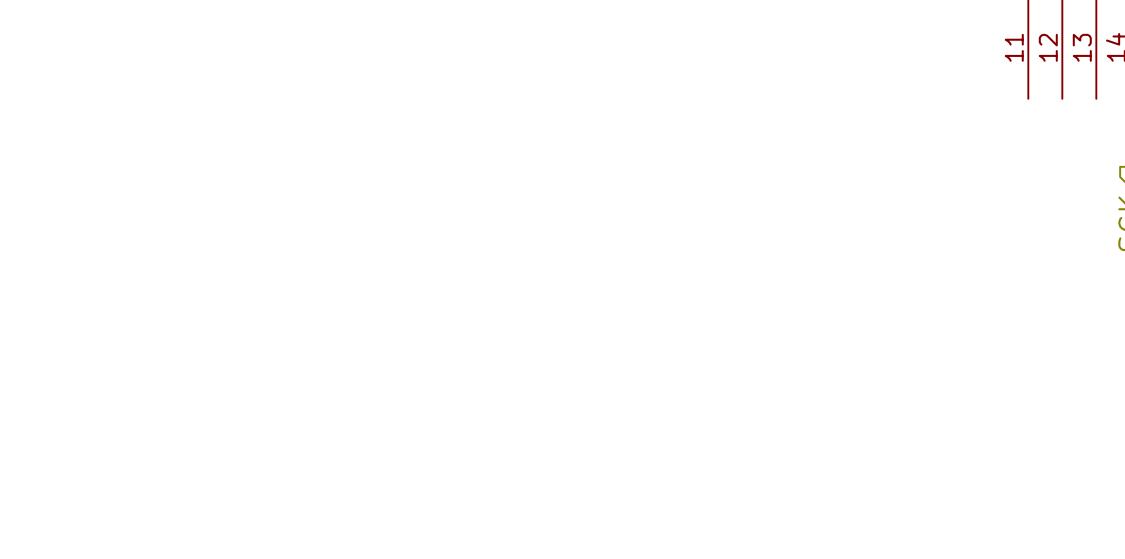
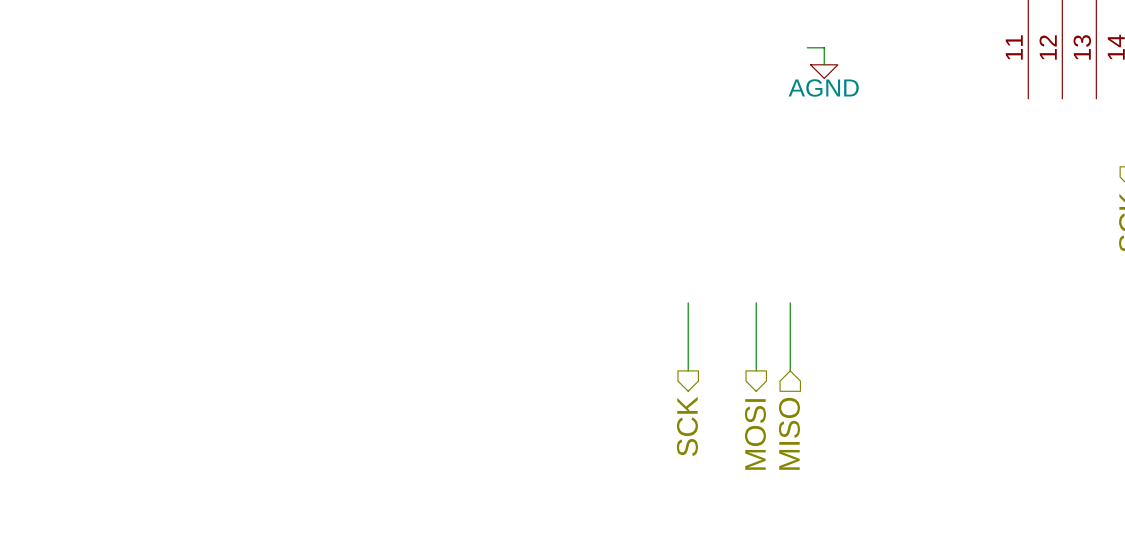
wire: none -> (807, 47) (824, 47) (824, 64)
power symbol: none -> AGND (824, 71)
wire: none -> (688, 302) (688, 370)
wire: none -> (756, 302) (756, 370)
wire: none -> (790, 302) (790, 370)
hierarchical label: none -> SCK (687, 426)
hierarchical label: none -> MOSI (755, 434)
hierarchical label: none -> MISO (789, 433)

